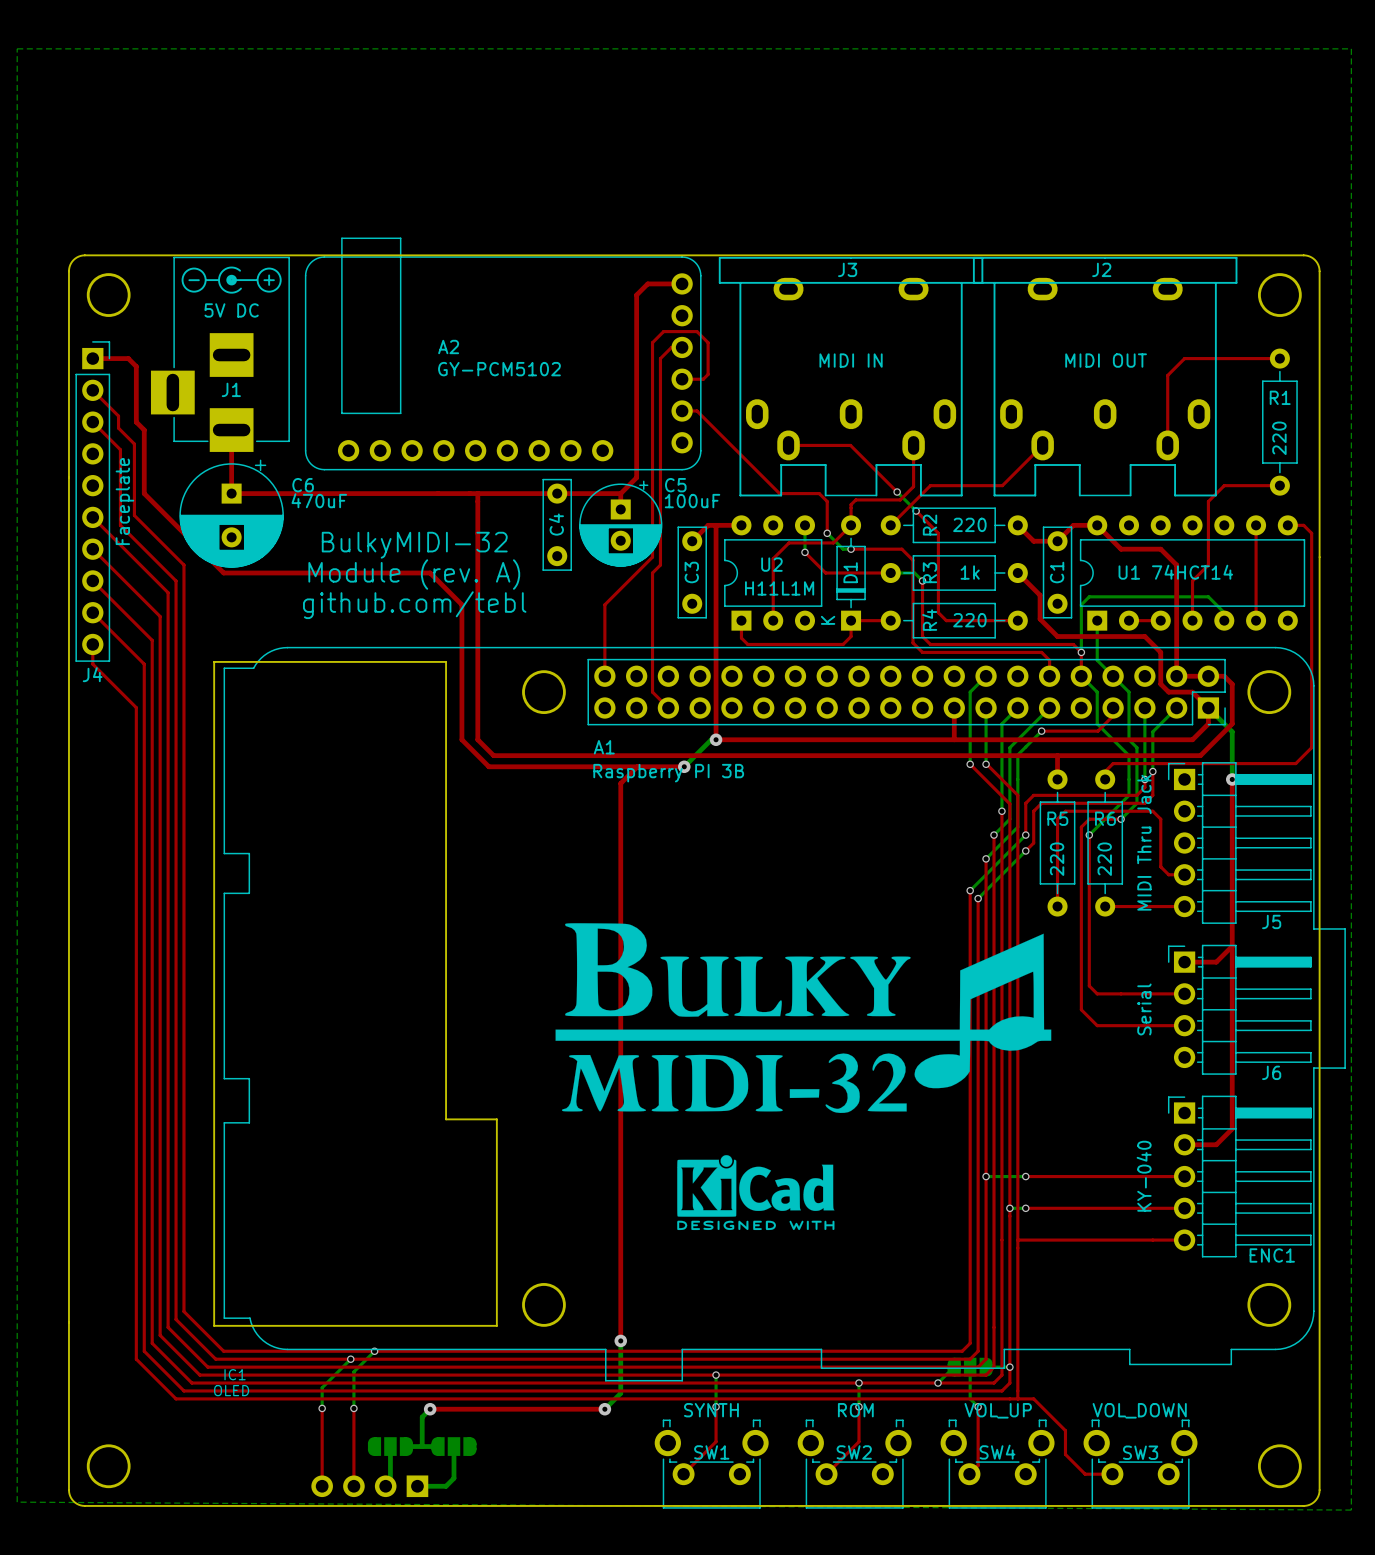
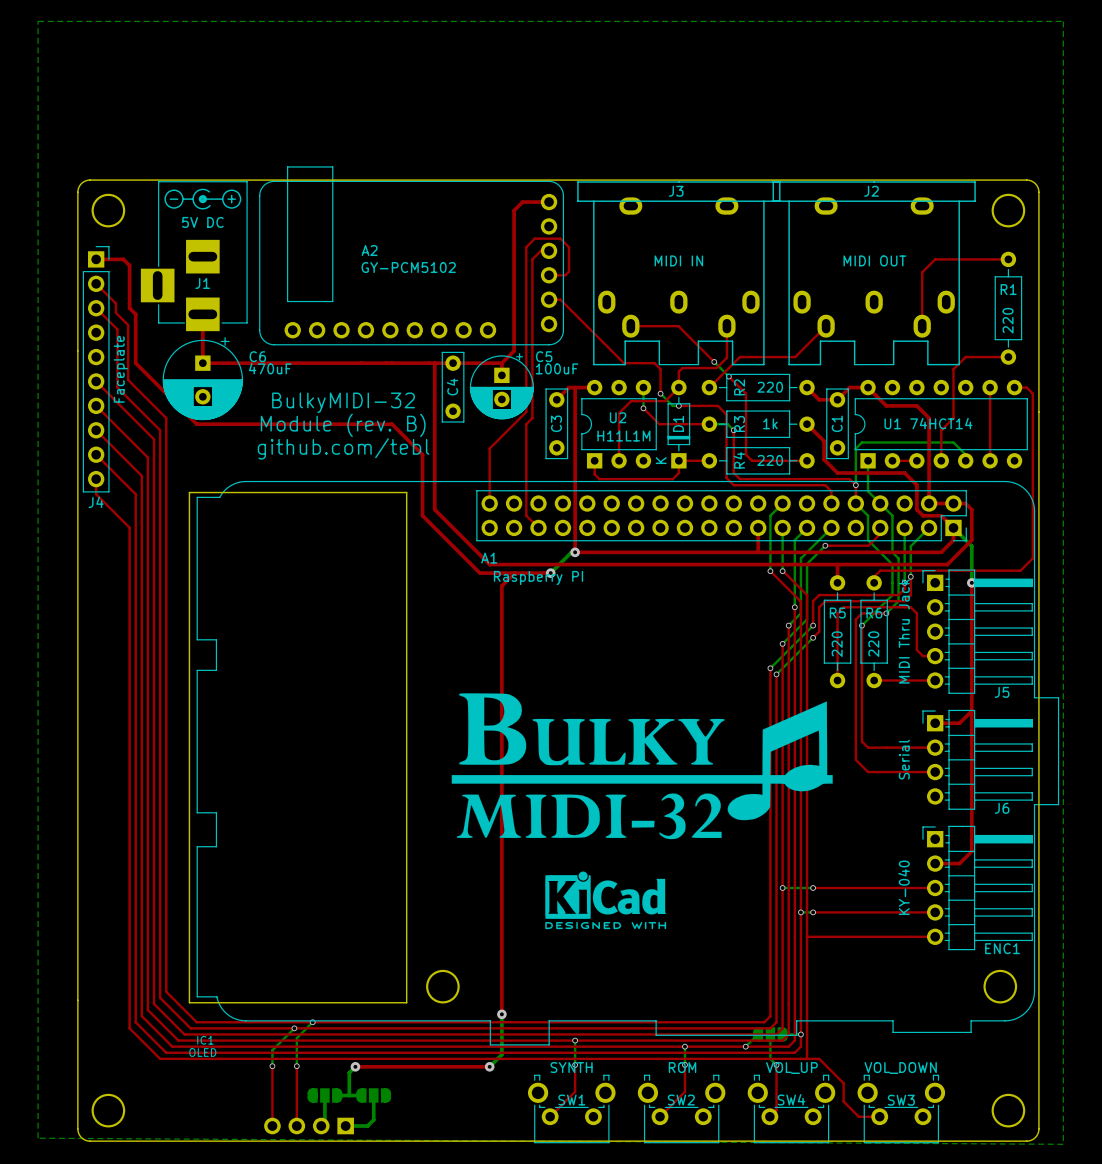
top track: (477, 493) (477, 739) (493, 755) (604, 755) -> (434, 363) (434, 509) (489, 564)
top track: (430, 573) (461, 604) (461, 739) (488, 766) (592, 766) -> (355, 424) (392, 424) (422, 454) (422, 515) (479, 573)
text: Module (rev. A) (414, 574) -> Module (rev. B) (343, 425)
A1 footprint: [223, 646, 1346, 1382] -> [196, 480, 1060, 1046]
board edge: (446, 661) (446, 1119) (496, 1119) -> (367, 492) (406, 492) (406, 844)
A1 value: Raspberry PI 3B (668, 773) -> Raspberry PI (538, 578)

